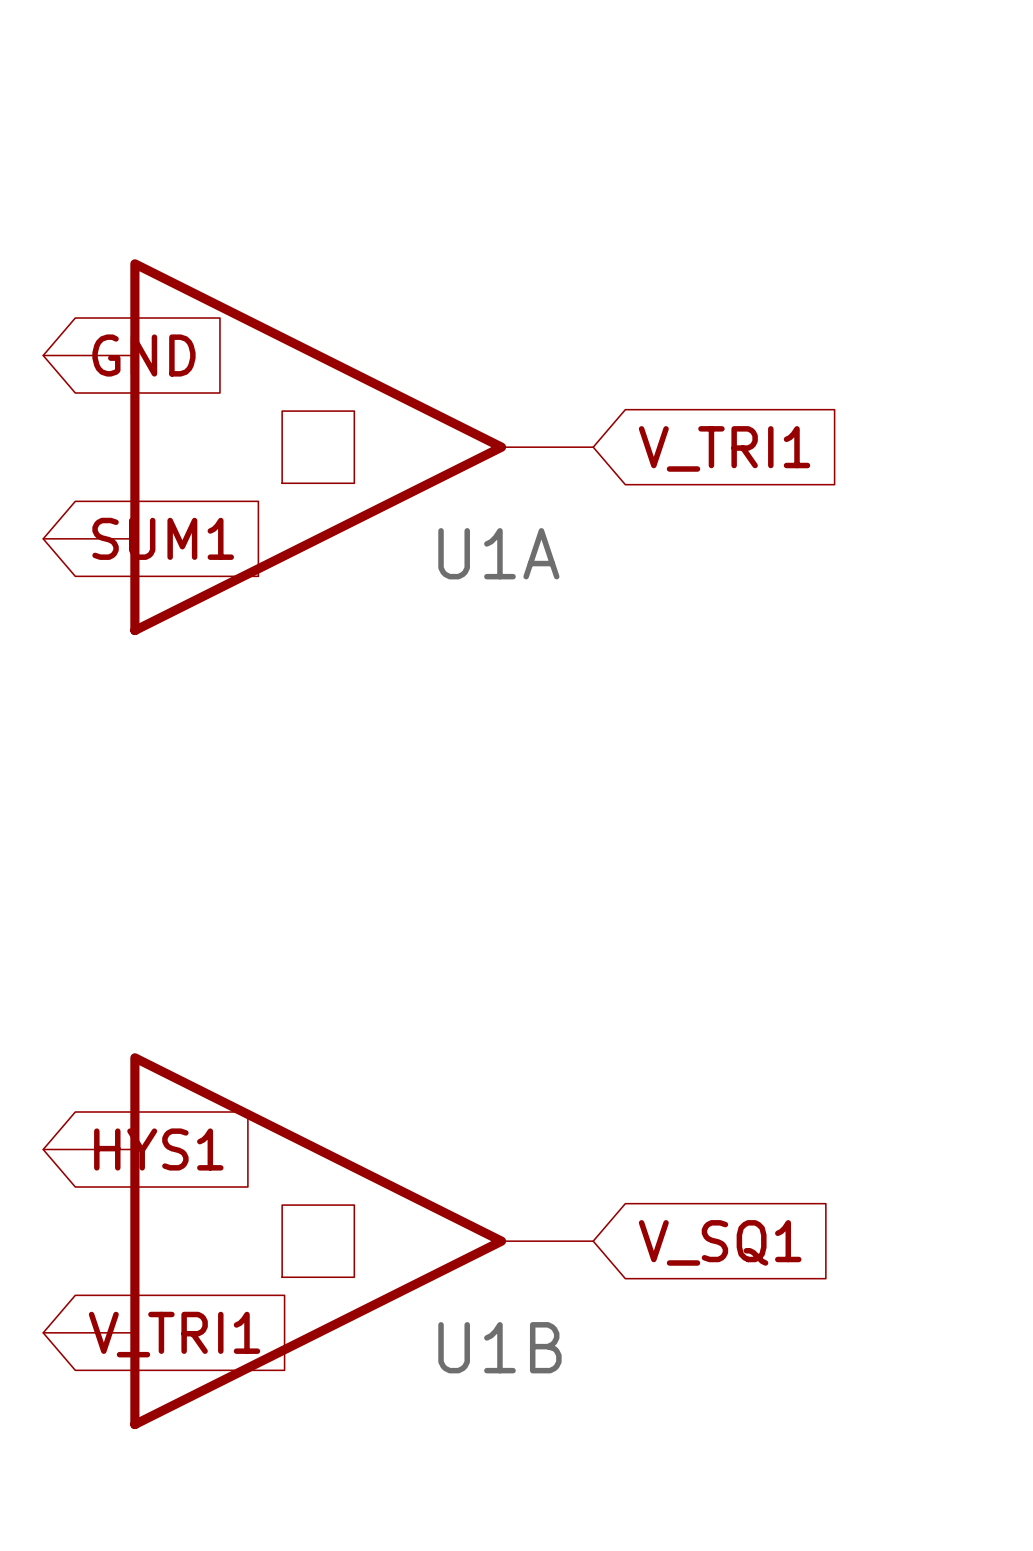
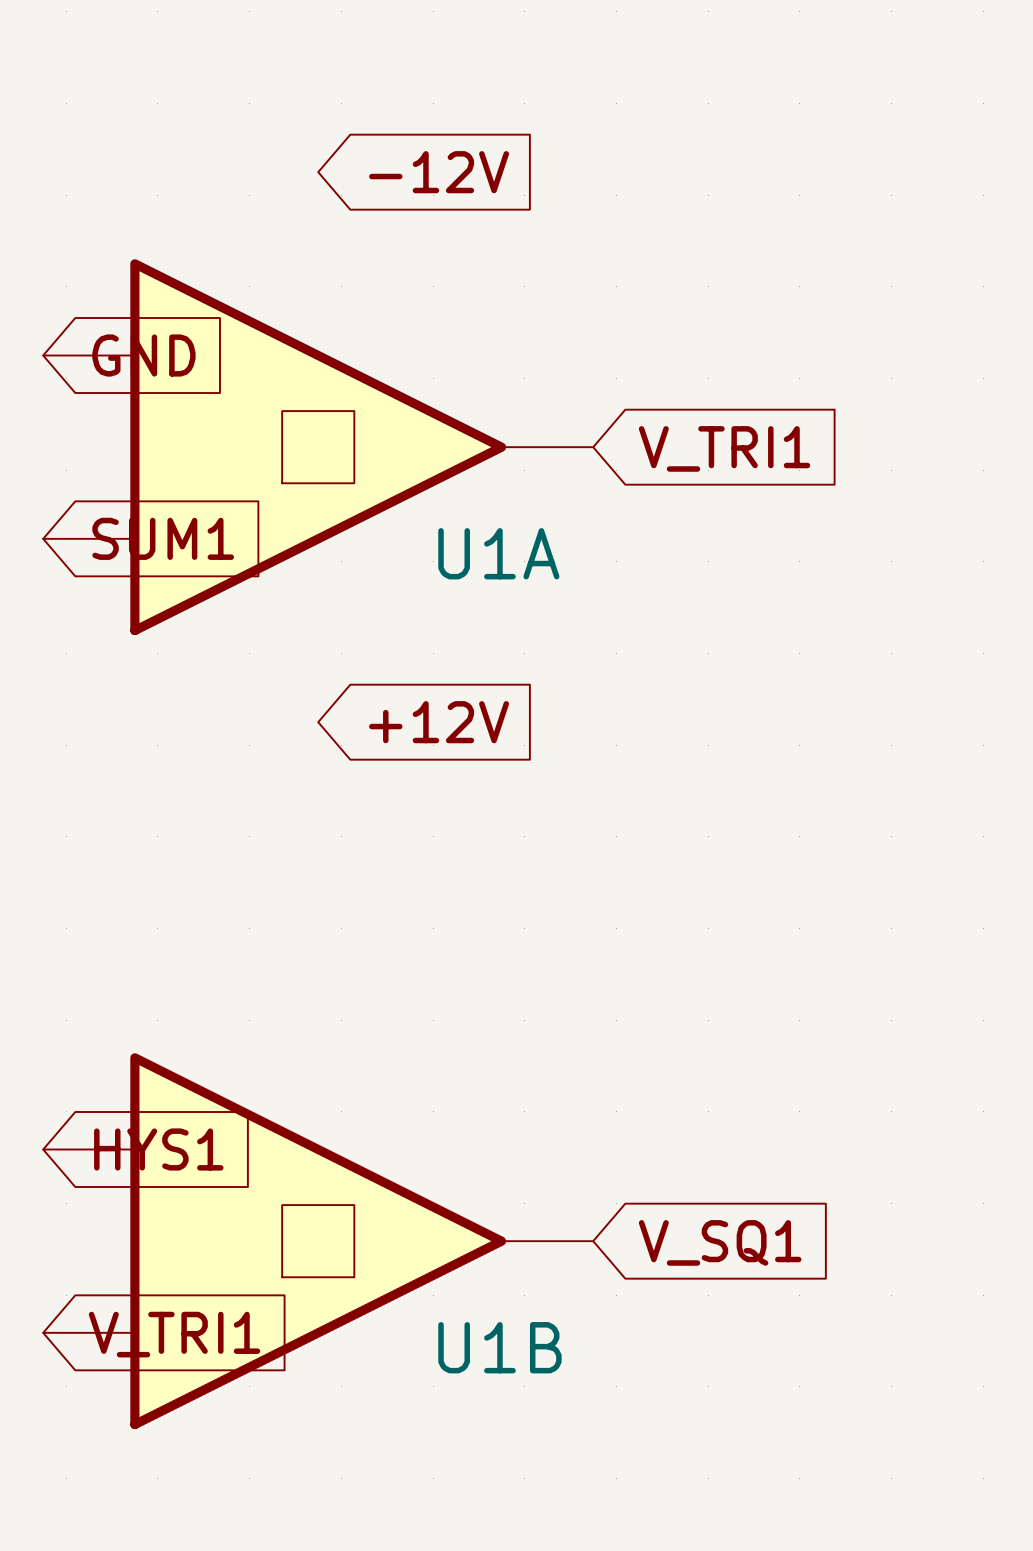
global label: none -> -12V (439, 172)
global label: none -> +12V (439, 722)

